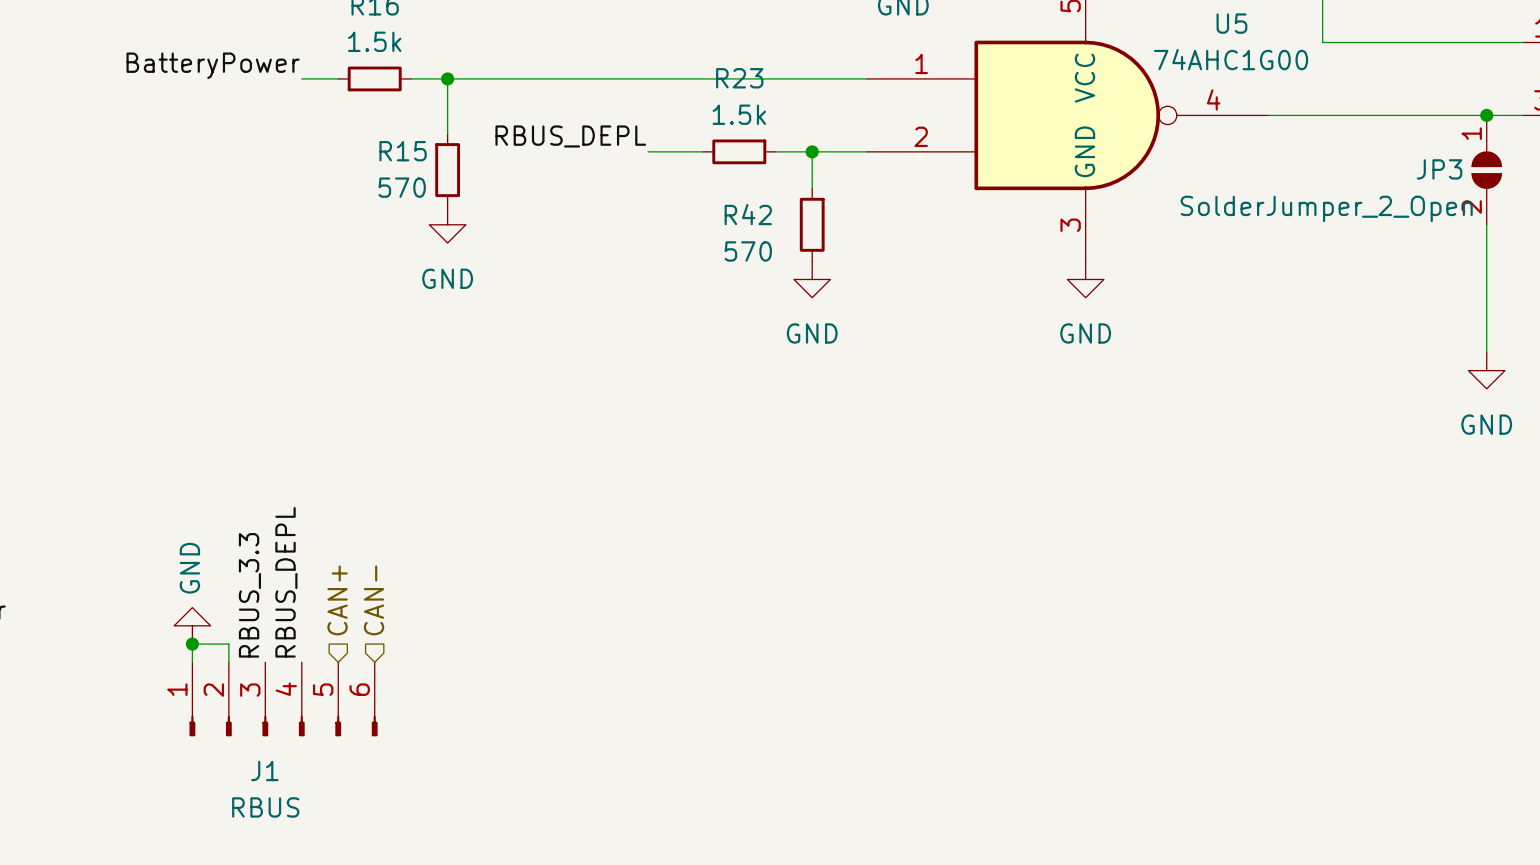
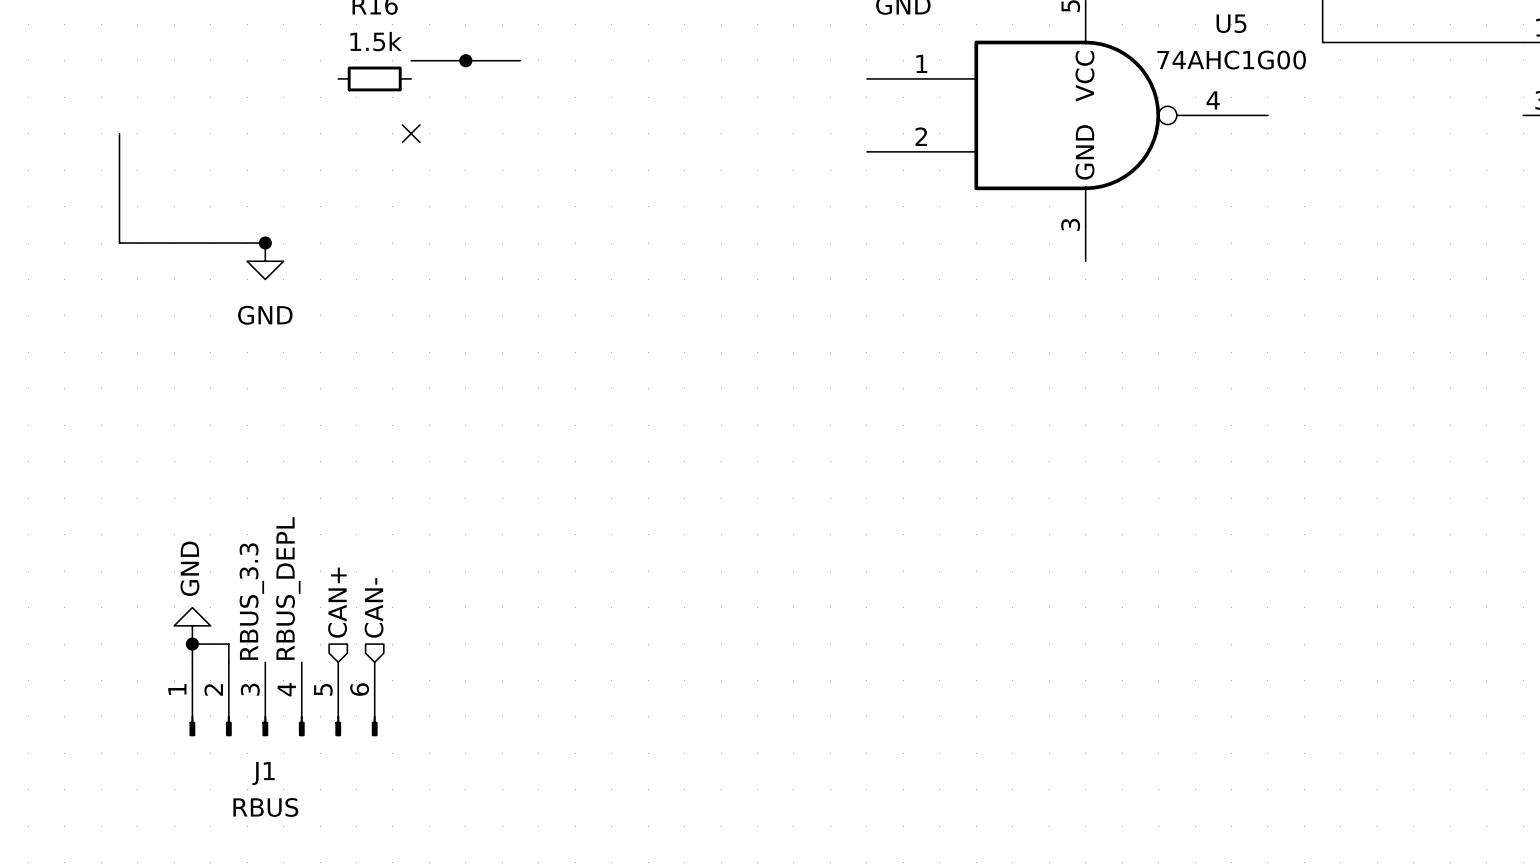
wire: none -> (411, 60) (520, 60)
label: BatteryPower (213, 65) -> none
wire: (301, 78) (338, 78) -> none
wire: (411, 78) (866, 78) -> none
wire: (447, 78) (447, 133) -> none
junction position: (447, 78) -> (465, 60)
wire: (1267, 115) (1523, 115) -> none
junction: (1486, 115) -> none
wire: none -> (119, 133) (119, 243) (265, 243)
no-connect mark: none -> (411, 133)
label: RBUS_DEPL (570, 136) -> none
wire: (648, 151) (702, 151) -> none
R23: 1.5k (739, 151) -> none
wire: (775, 151) (866, 151) -> none
wire: (812, 151) (812, 188) -> none
junction: (812, 151) -> none
R15: 570 (447, 170) -> none
JP3: SolderJumper_2_Open (1486, 170) -> none
power symbol position: GND (447, 224) -> GND (265, 261)
R42: 570 (812, 224) -> none
wire: (1486, 224) (1486, 352) -> none
junction: none -> (265, 243)
power symbol: GND (812, 279) -> none
power symbol: GND (1085, 279) -> none
power symbol: GND (1486, 370) -> none

